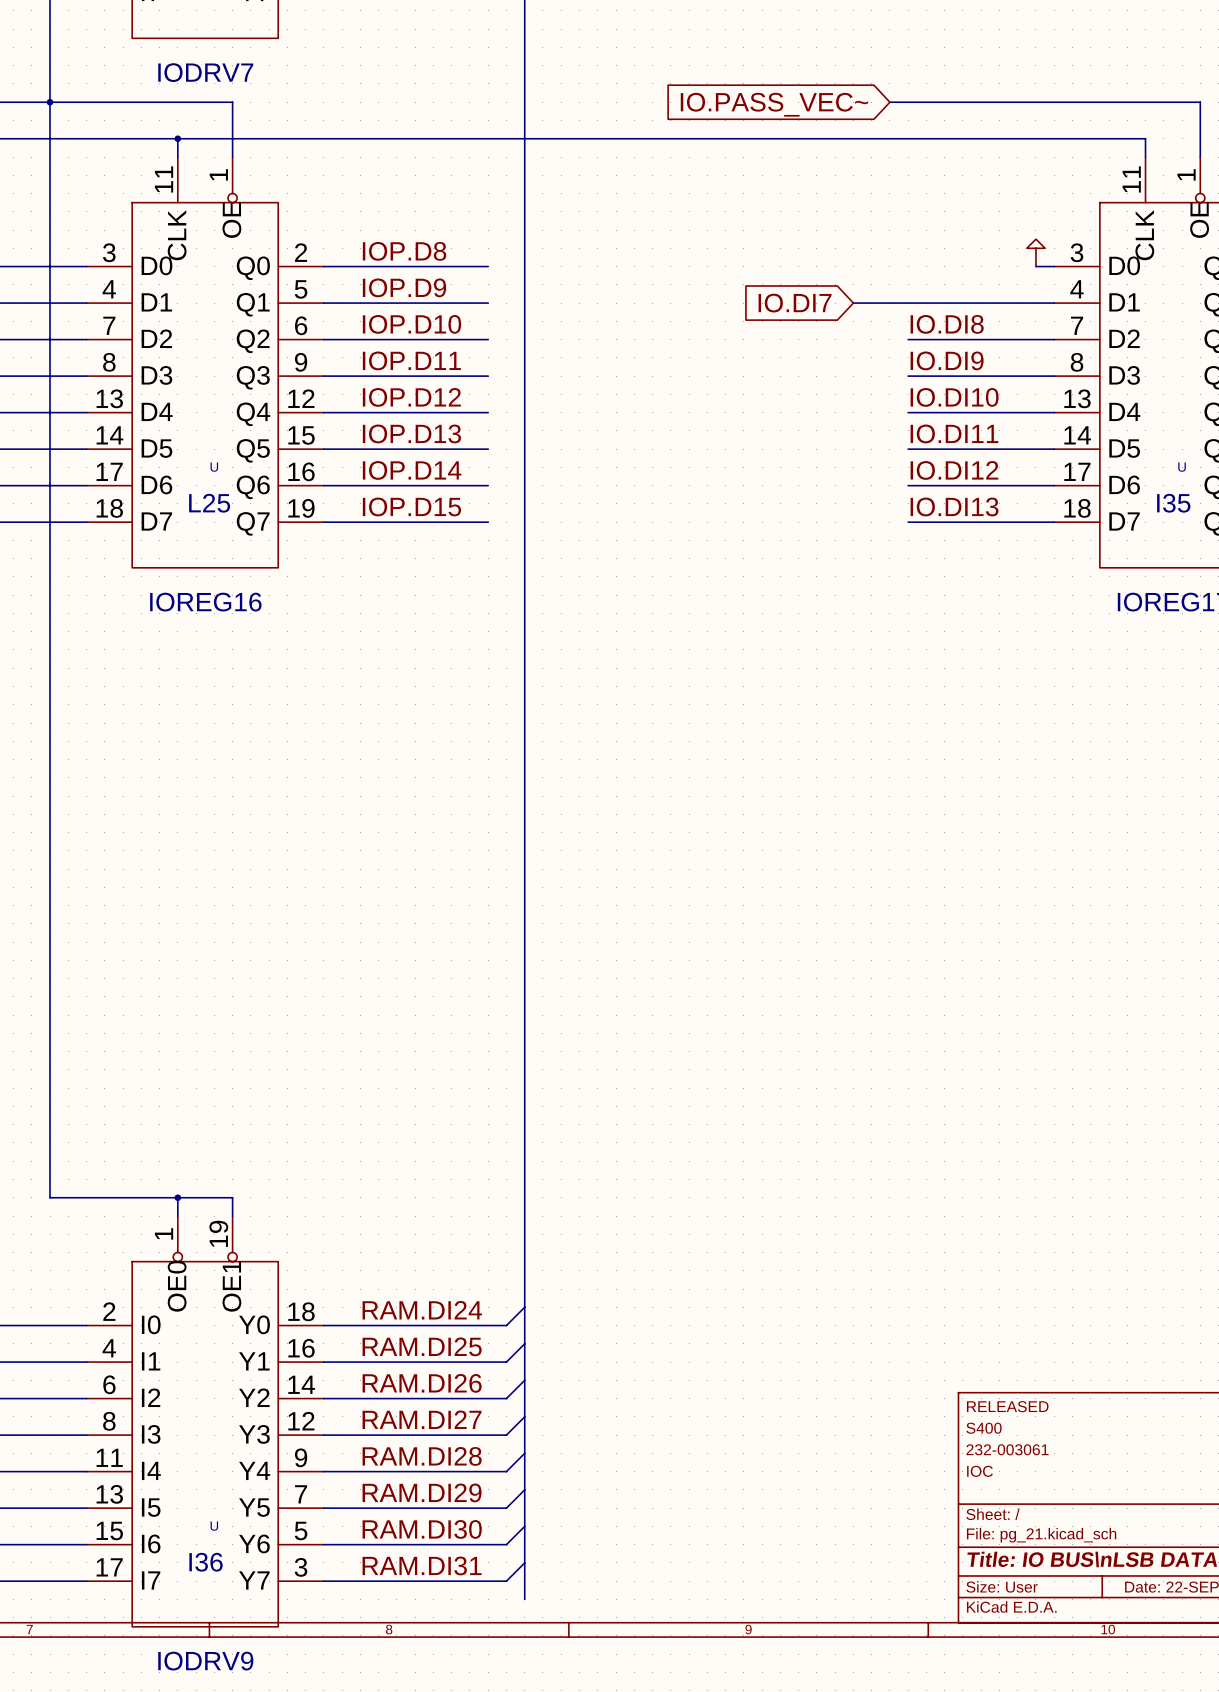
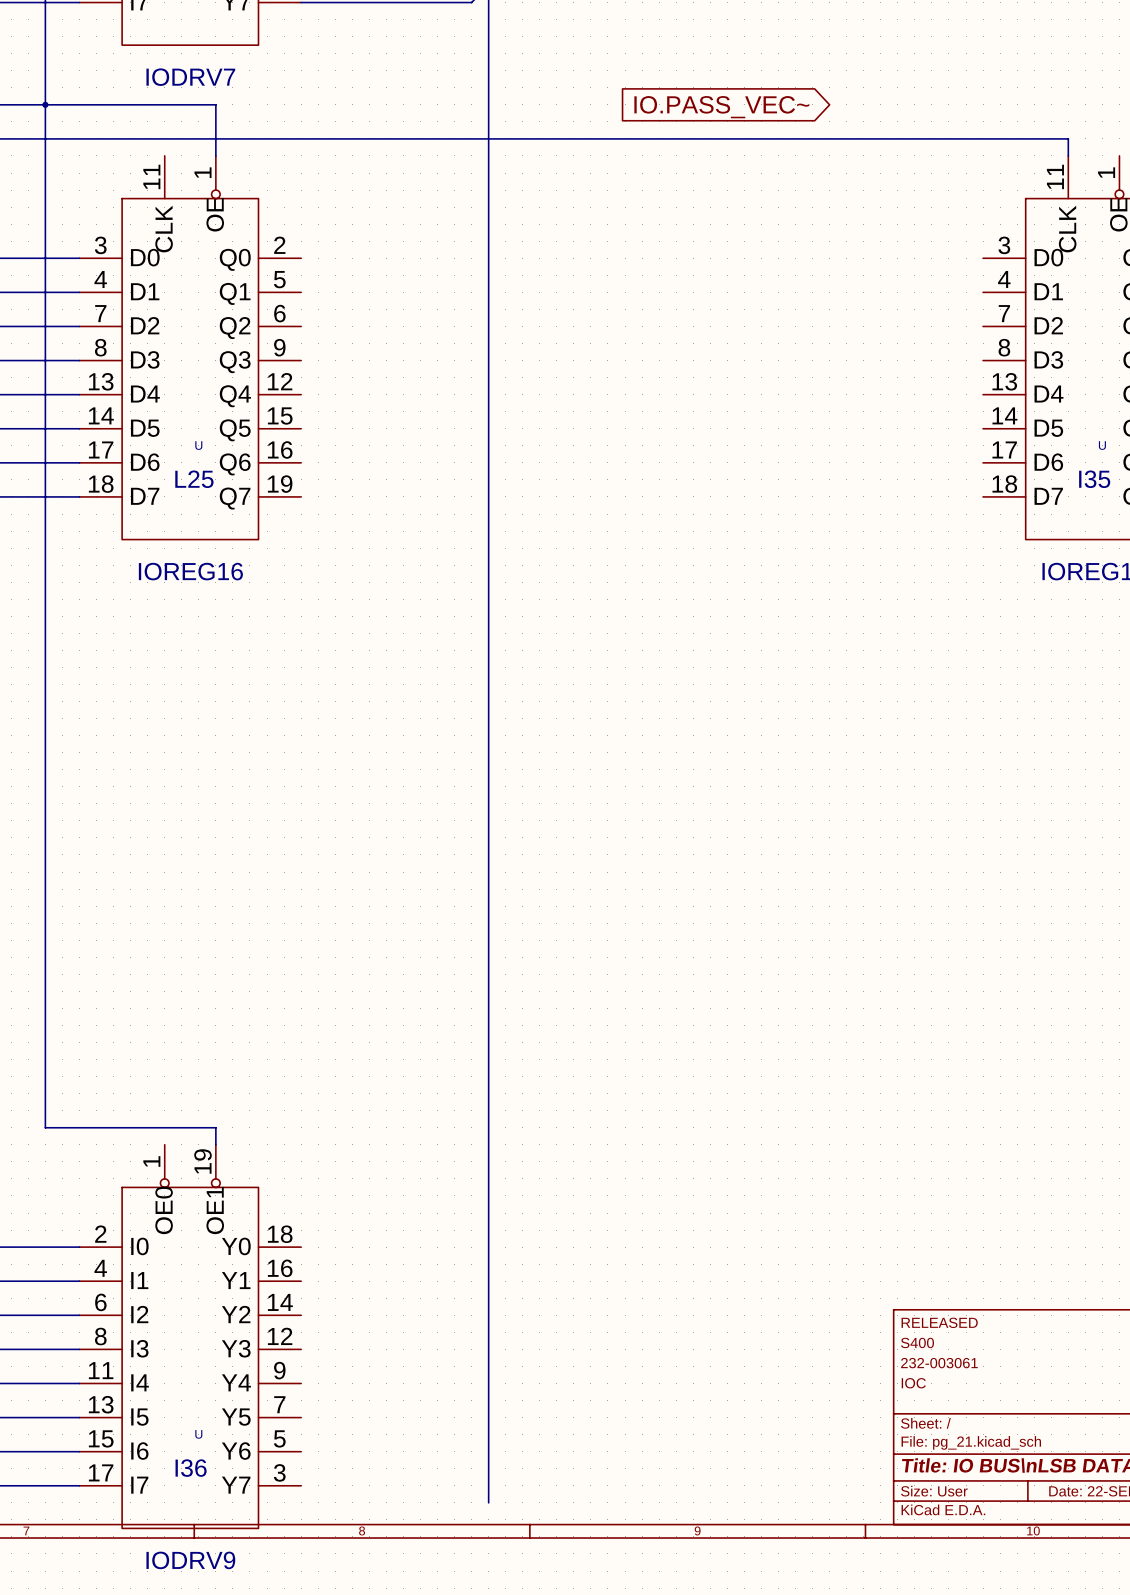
wire: (889, 102) (1200, 102) (1200, 157) -> none
wire: (177, 138) (177, 157) -> none
junction: (177, 138) -> none
label: IOP.D8 (404, 251) -> none
power symbol: (1035, 252) -> none
wire: (323, 266) (488, 266) -> none
wire: (1035, 266) (1054, 266) -> none
label: IOP.D9 (404, 287) -> none
wire: (323, 303) (488, 303) -> none
global label: IO.DI7 (795, 303) -> none
wire: (853, 303) (1054, 303) -> none
label: IOP.D10 (411, 324) -> none
label: IO.DI8 (947, 324) -> none
wire: (323, 339) (488, 339) -> none
wire: (908, 339) (1054, 339) -> none
label: IOP.D11 (411, 360) -> none
label: IO.DI9 (947, 360) -> none
wire: (323, 376) (488, 376) -> none
wire: (908, 376) (1054, 376) -> none
label: IOP.D12 (411, 397) -> none
label: IO.DI10 (954, 397) -> none
wire: (323, 412) (488, 412) -> none
wire: (908, 412) (1054, 412) -> none
label: IOP.D13 (411, 433) -> none
label: IO.DI11 (954, 433) -> none
wire: (323, 449) (488, 449) -> none
wire: (908, 449) (1054, 449) -> none
label: IOP.D14 (412, 470) -> none
label: IO.DI12 (954, 470) -> none
wire: (323, 485) (488, 485) -> none
wire: (908, 485) (1054, 485) -> none
label: IOP.D15 (411, 506) -> none
label: IO.DI13 (954, 506) -> none
wire: (323, 522) (488, 522) -> none
wire: (908, 522) (1054, 522) -> none
wire: (177, 1197) (177, 1216) -> none
junction: (177, 1197) -> none
wire: (524, 1307) (506, 1325) (323, 1325) -> none
label: RAM.DI24 (422, 1310) -> none
wire: (524, 1343) (506, 1362) (323, 1362) -> none
label: RAM.DI25 (422, 1346) -> none
wire: (524, 1380) (506, 1398) (323, 1398) -> none
label: RAM.DI26 (422, 1383) -> none
wire: (524, 1416) (506, 1435) (323, 1435) -> none
label: RAM.DI27 (422, 1419) -> none
wire: (524, 1453) (506, 1471) (323, 1471) -> none
label: RAM.DI28 (422, 1456) -> none
wire: (524, 1489) (506, 1508) (323, 1508) -> none
label: RAM.DI29 (422, 1492) -> none
wire: (524, 1526) (506, 1544) (323, 1544) -> none
label: RAM.DI30 (422, 1529) -> none
wire: (524, 1562) (506, 1581) (323, 1581) -> none
label: RAM.DI31 (422, 1565) -> none

